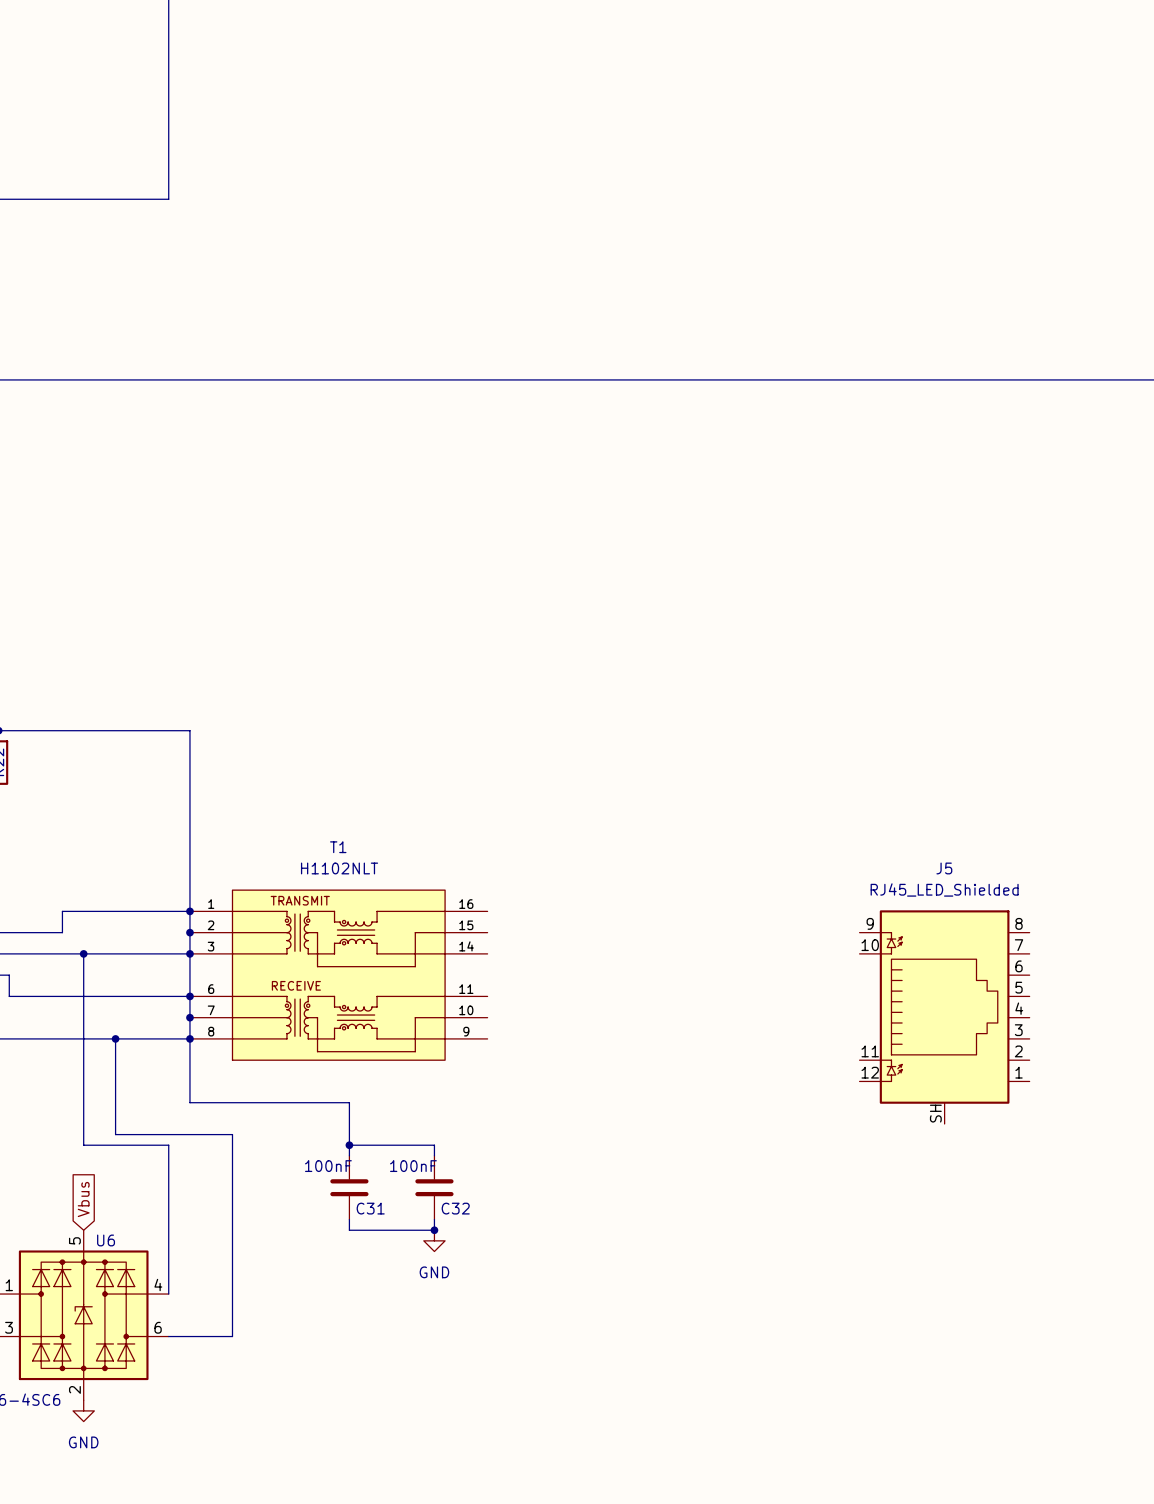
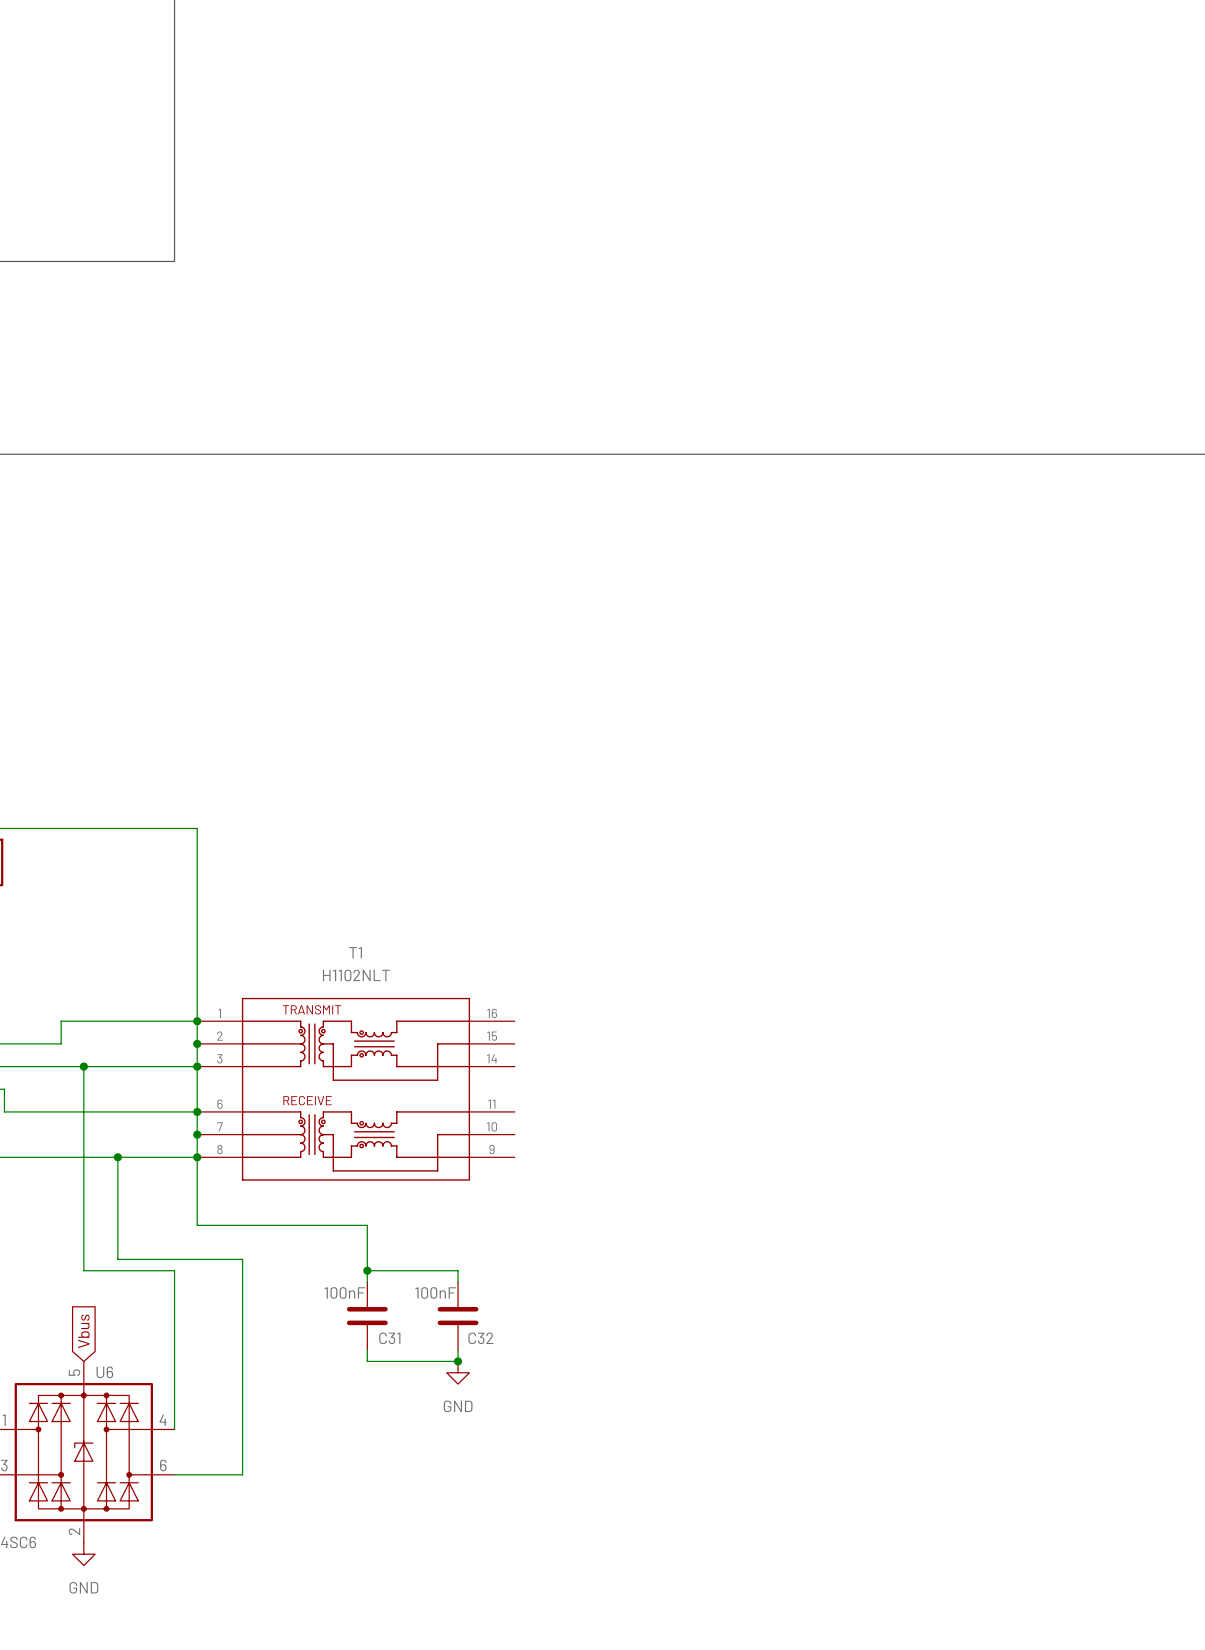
J5: RJ45_LED_Shielded (944, 1017) -> none

